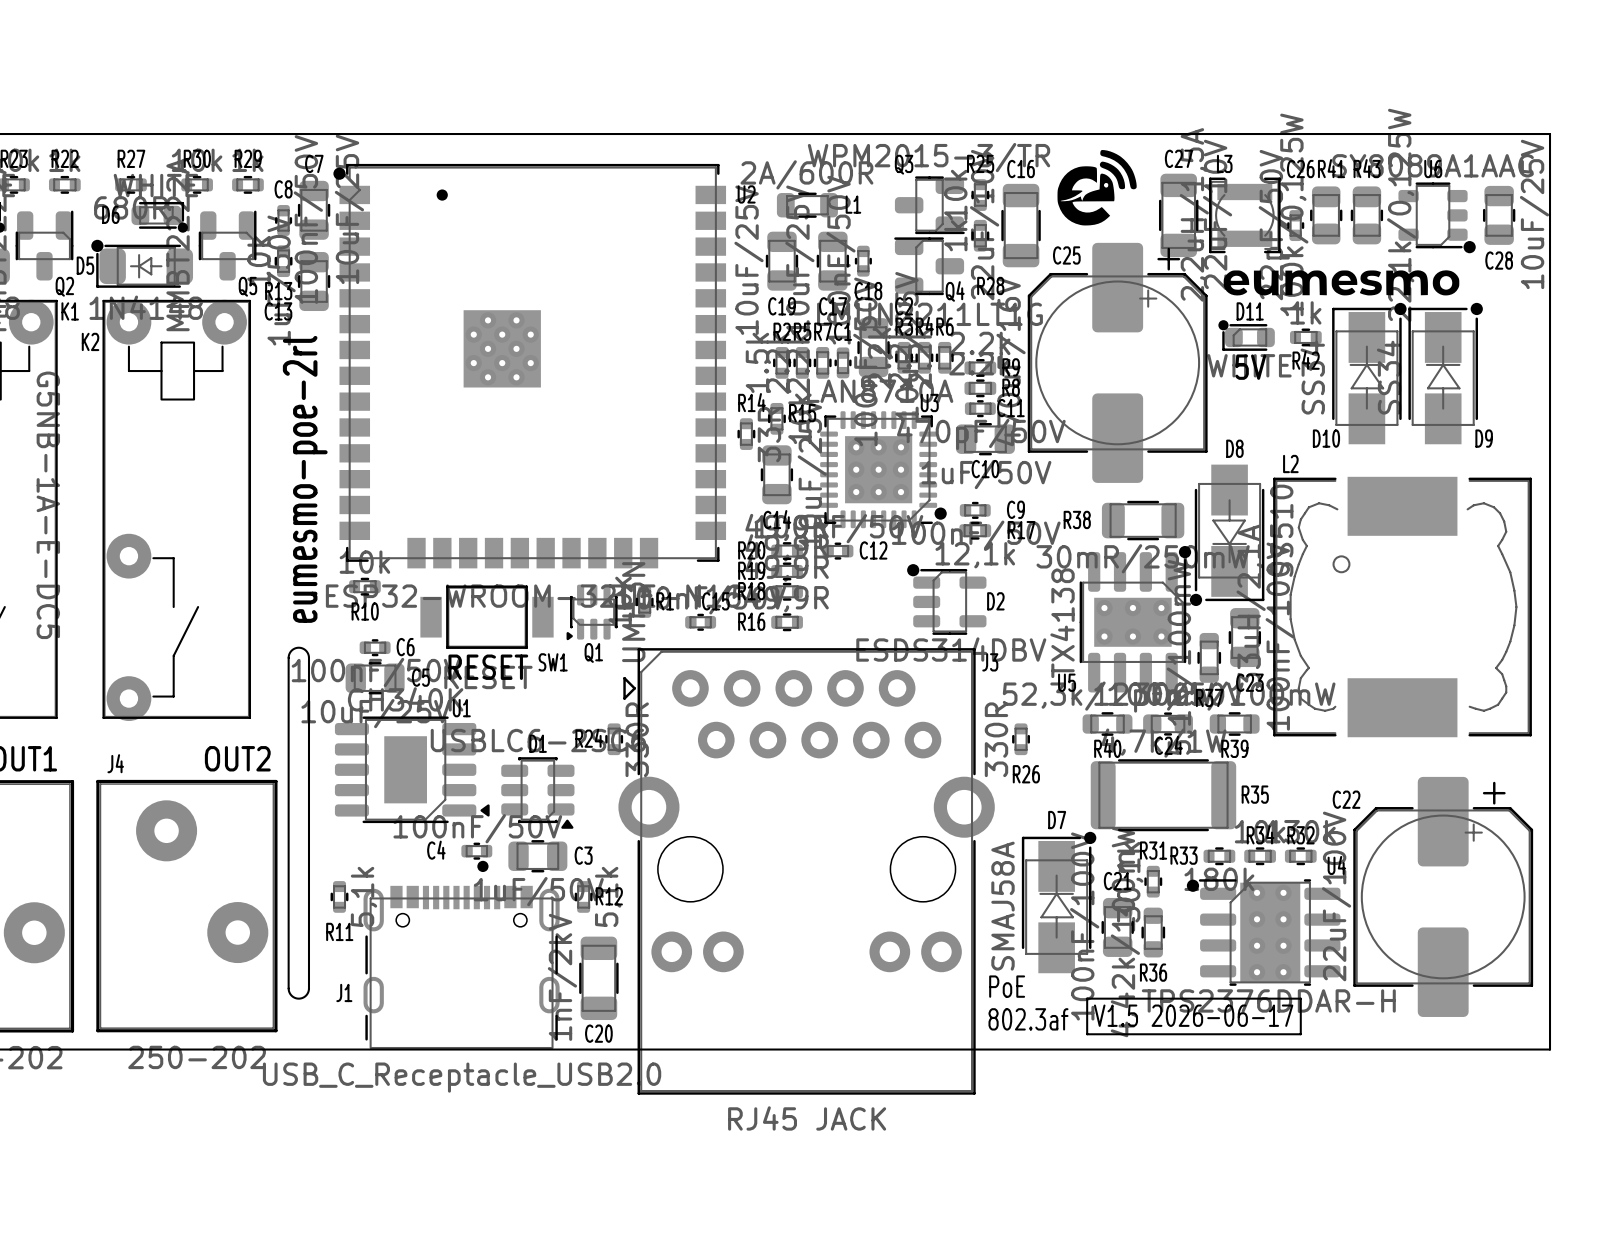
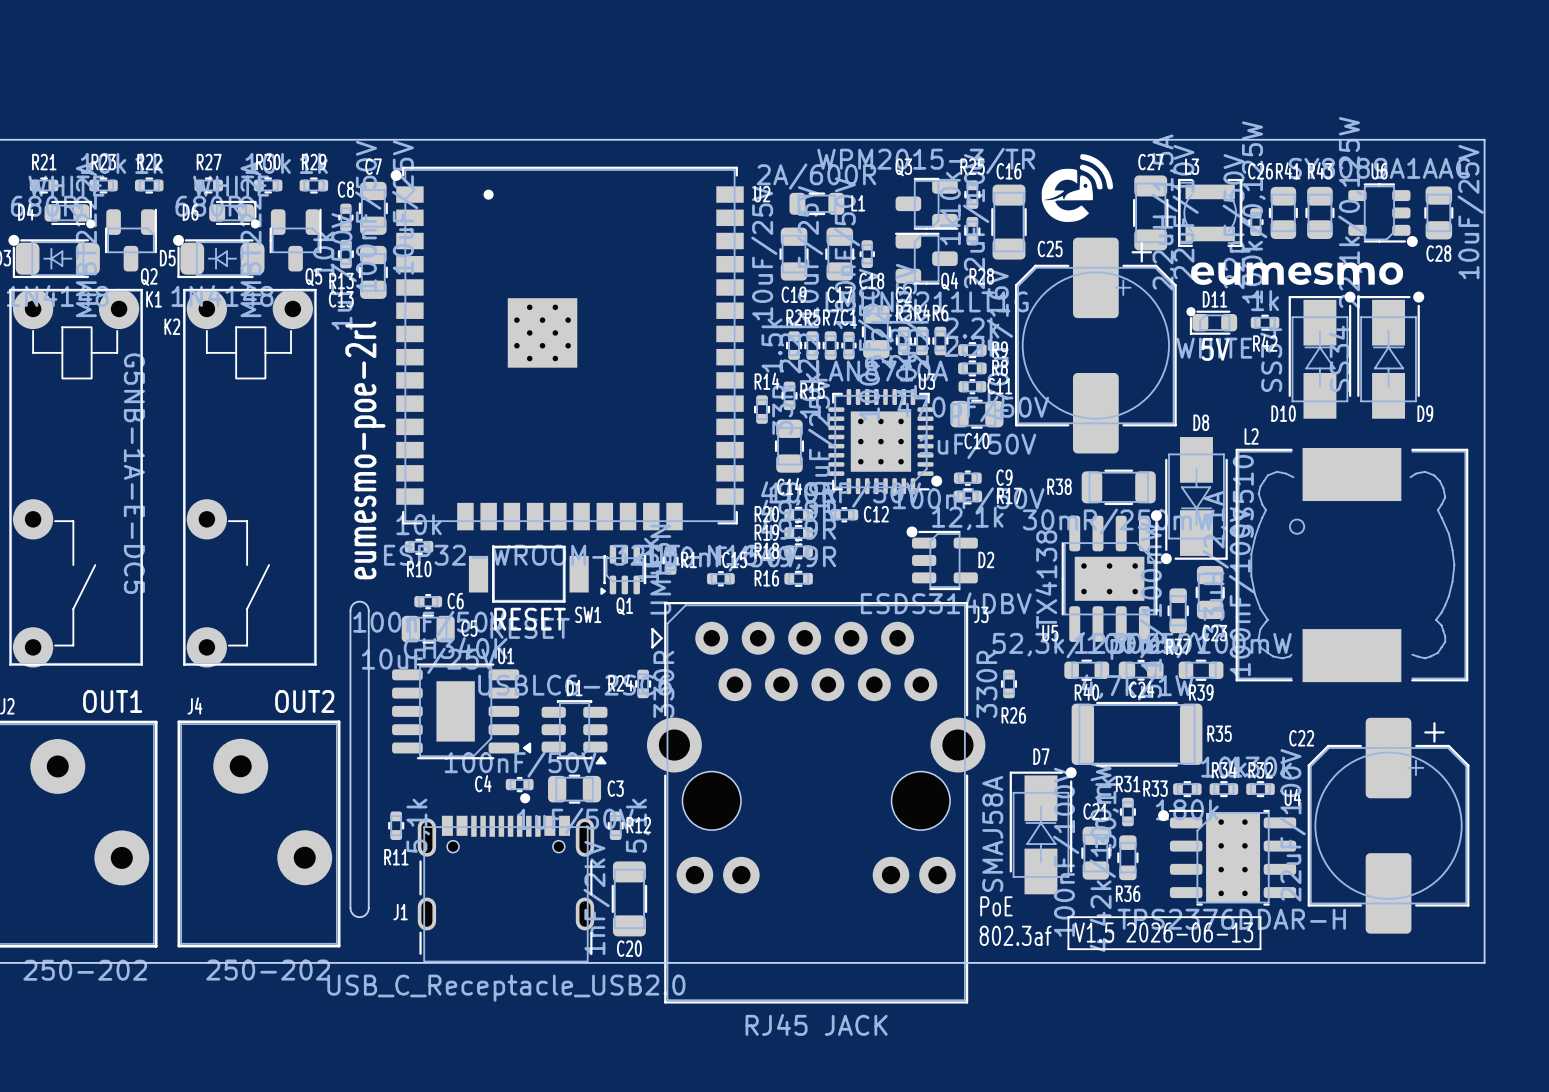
text: V1.5 2026-06-17 (1193, 1015) -> V1.5 2026-06-13 (1163, 932)

